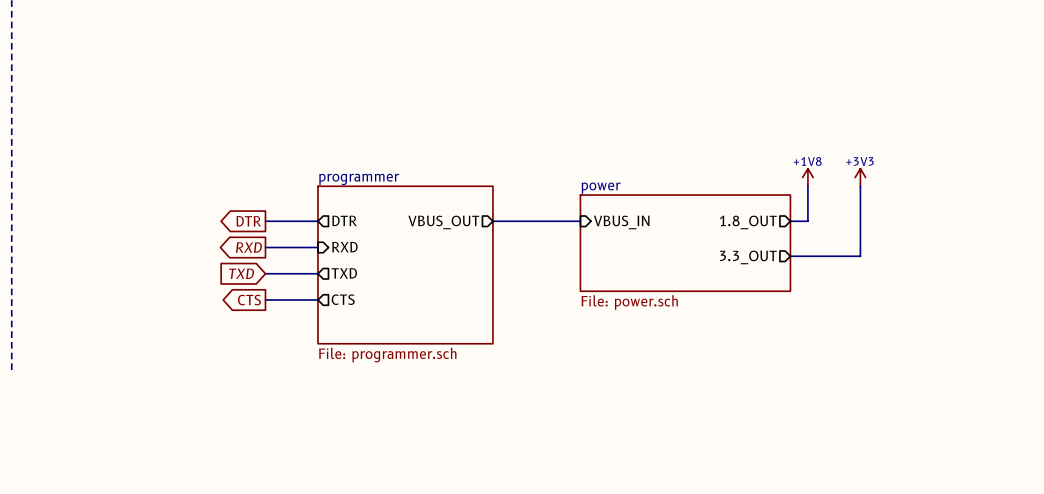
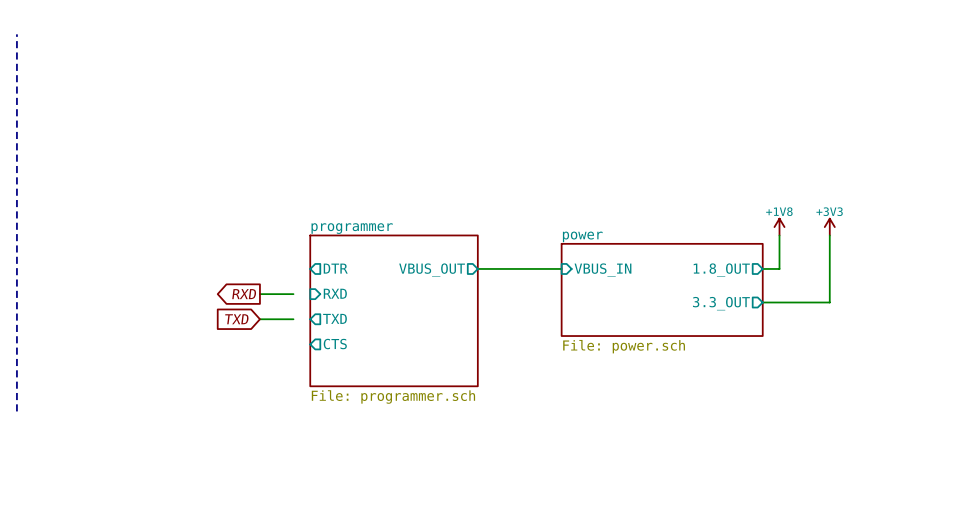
global label: DTR (248, 221) -> none
wire: (265, 221) (317, 221) -> none
wire: (300, 247) (317, 247) -> none
wire: (300, 273) (317, 273) -> none
global label: CTS (249, 300) -> none
wire: (265, 300) (317, 300) -> none

